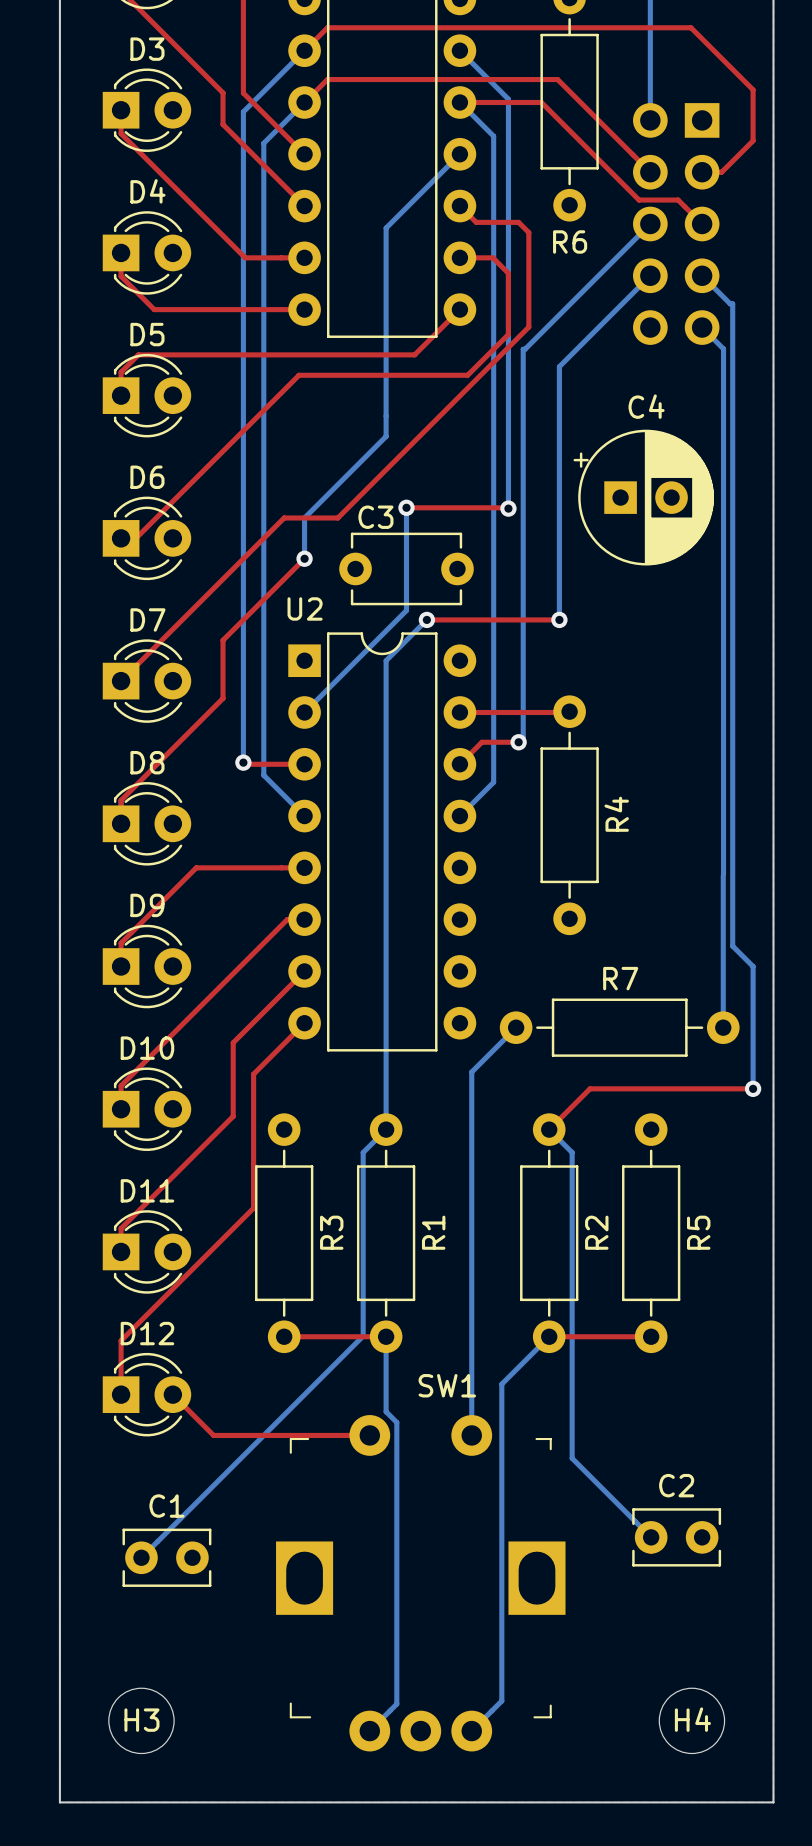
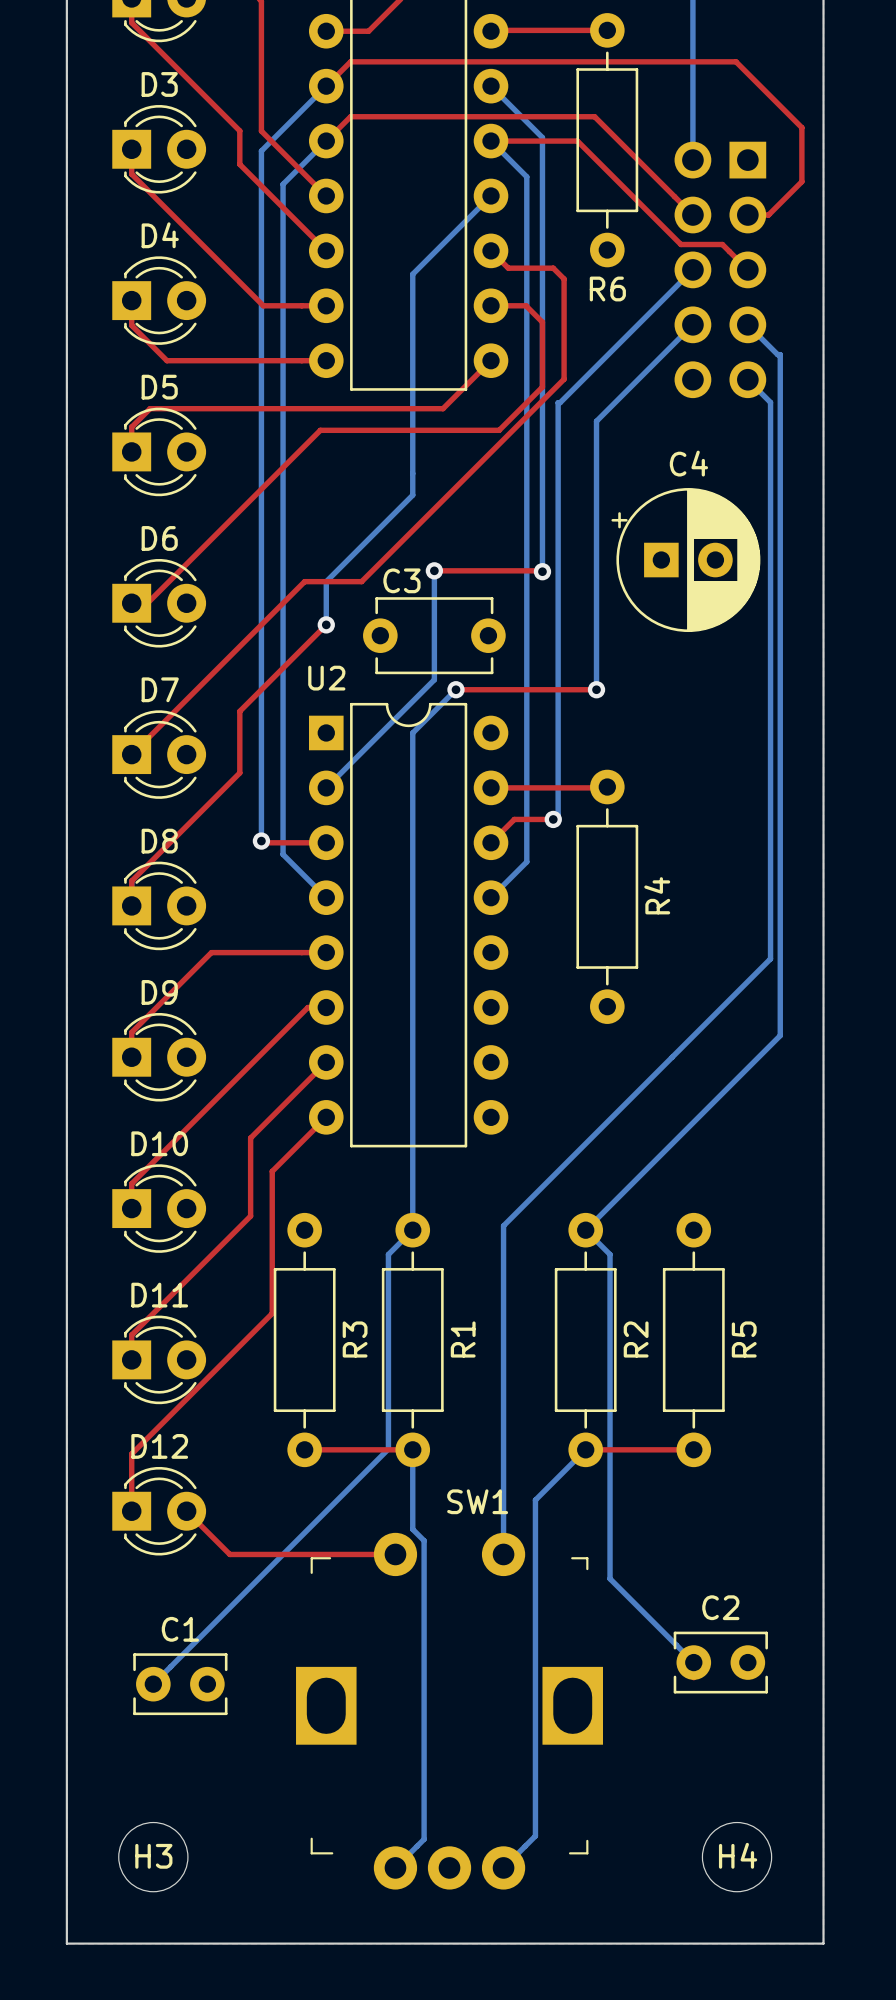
bottom track: (723, 875) (723, 1027) -> none
bottom track: (732, 946) (753, 966) (753, 1088) -> (780, 1035) (585, 1230)
bottom track: (516, 1027) (471, 1072) (471, 1125) -> (770, 958) (503, 1225)
R7: (619, 1027) -> none
top track: (753, 1088) (590, 1088) (549, 1129) -> none
via: (753, 1088) -> none

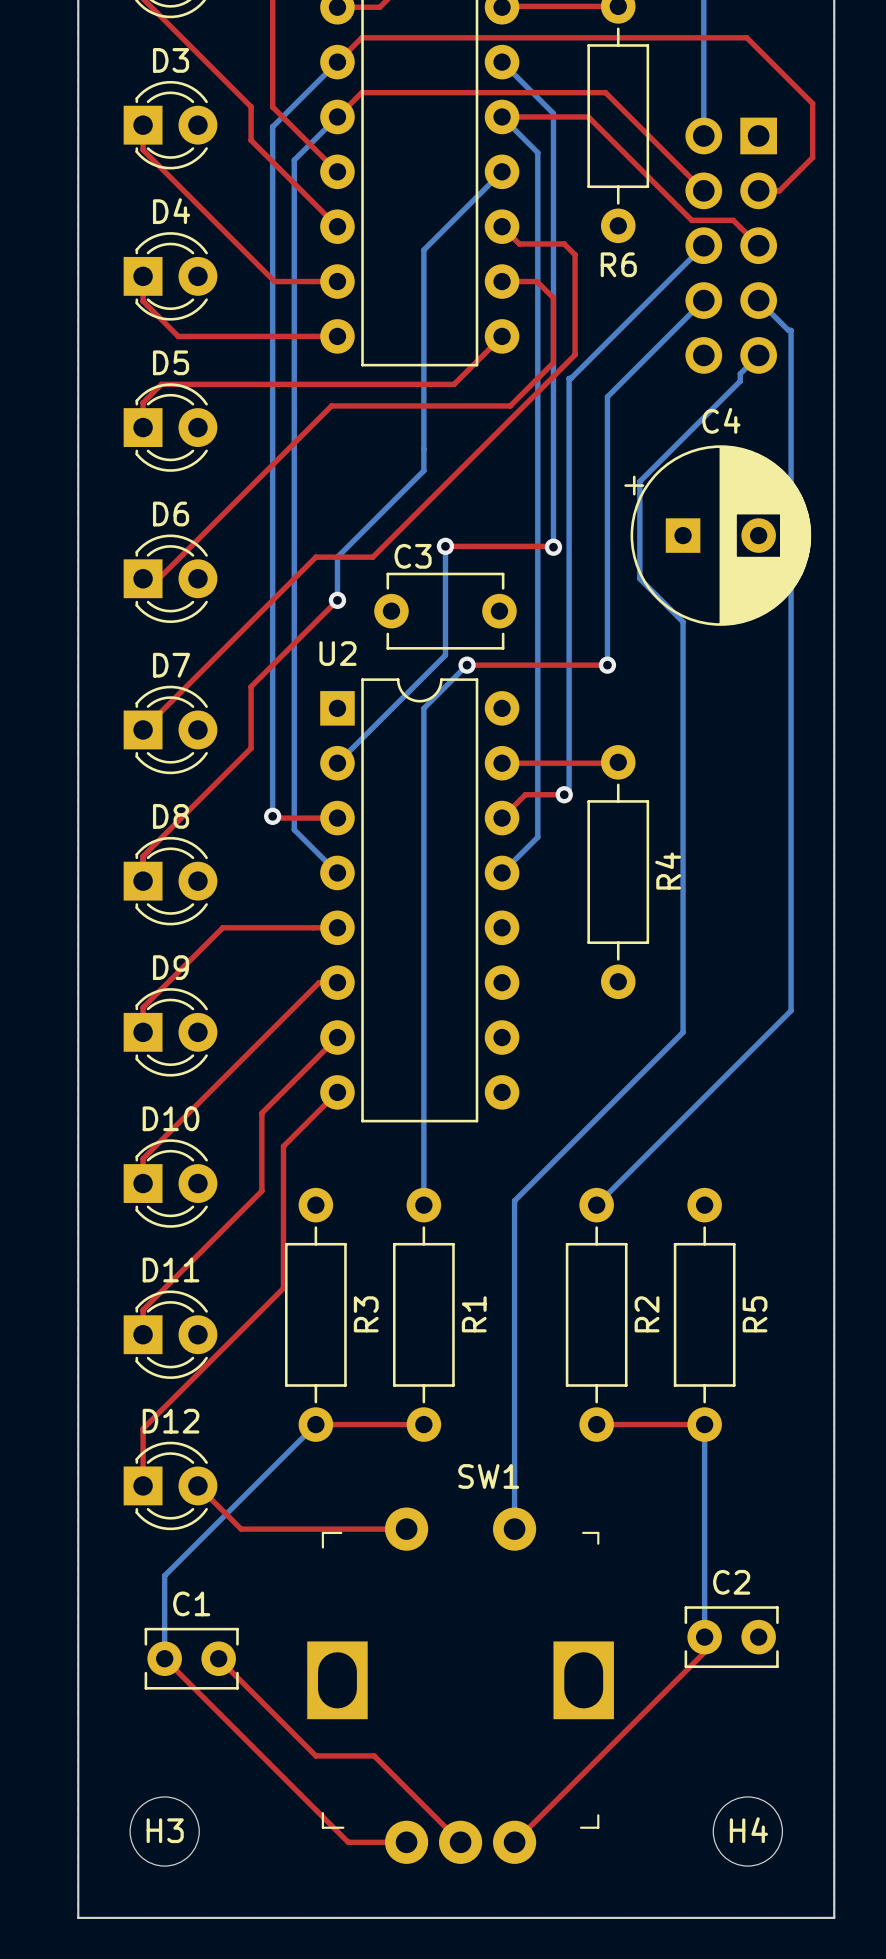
bottom track: (747, 379) (770, 402) (770, 958) (672, 1057) -> (758, 355) (740, 373) (740, 381) (639, 481) (639, 578) (683, 621) (683, 1032)
C4 footprint: [611, 488, 761, 633] -> [624, 445, 812, 626]
bottom track: (412, 1230) (388, 1254) (388, 1449) (153, 1684) -> (315, 1424) (164, 1575) (164, 1658)
bottom track: (585, 1230) (610, 1254) (610, 1578) (693, 1662) -> (704, 1424) (704, 1637)
bottom track: (412, 1449) (412, 1529) (424, 1540) (424, 1839) (395, 1867) -> none
bottom track: (585, 1449) (535, 1500) (535, 1836) (503, 1867) -> none
top track: none -> (704, 1652) (514, 1842)
top track: none -> (164, 1658) (348, 1842) (406, 1842)
top track: none -> (218, 1658) (315, 1755) (374, 1755) (460, 1842)

